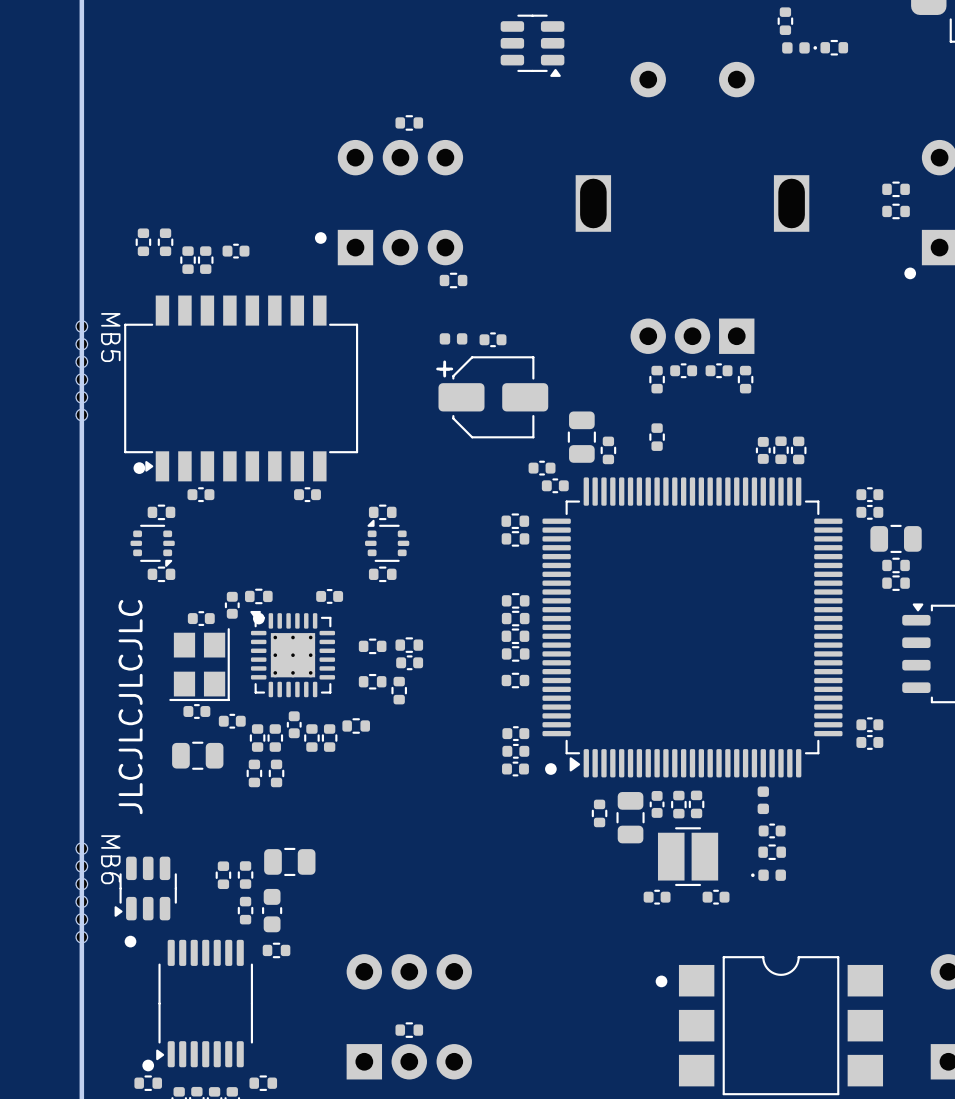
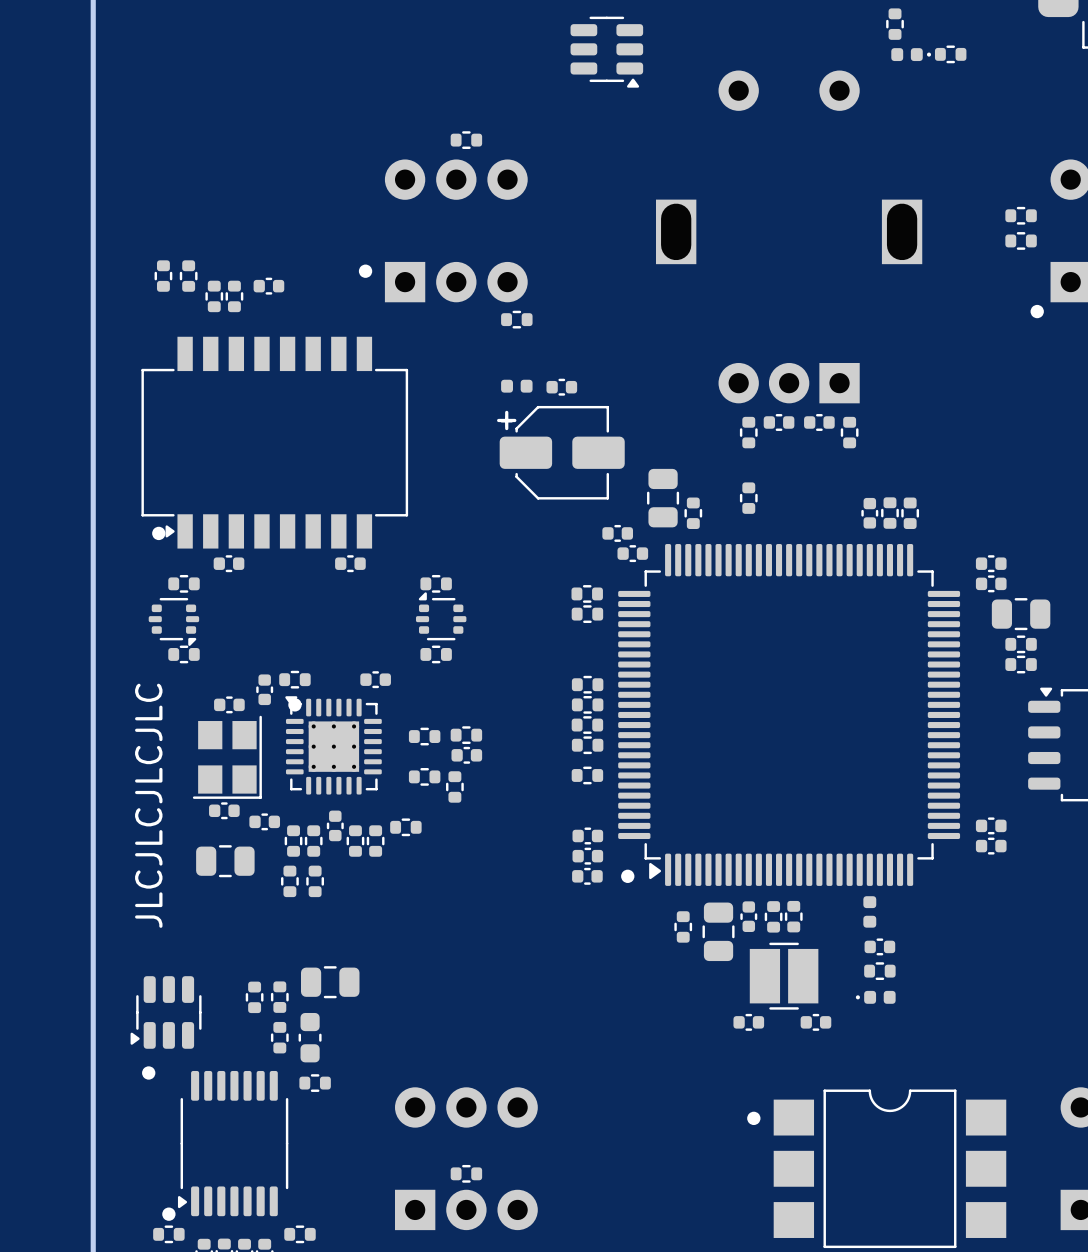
MB5: (81, 370) -> none
MB6: (81, 892) -> none

